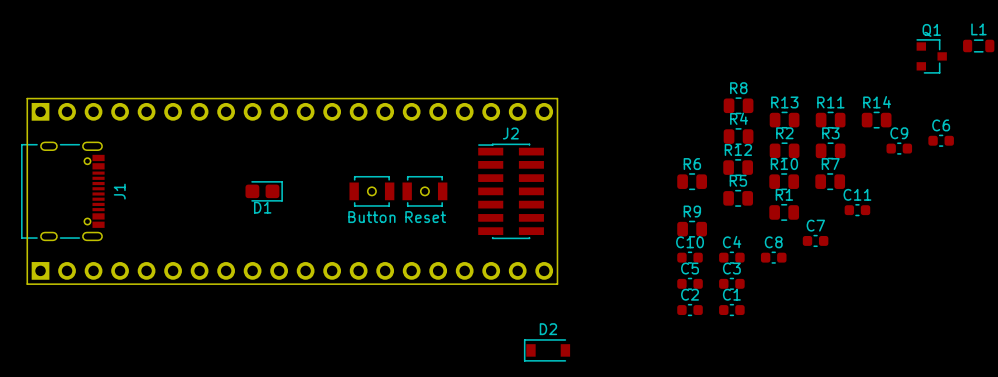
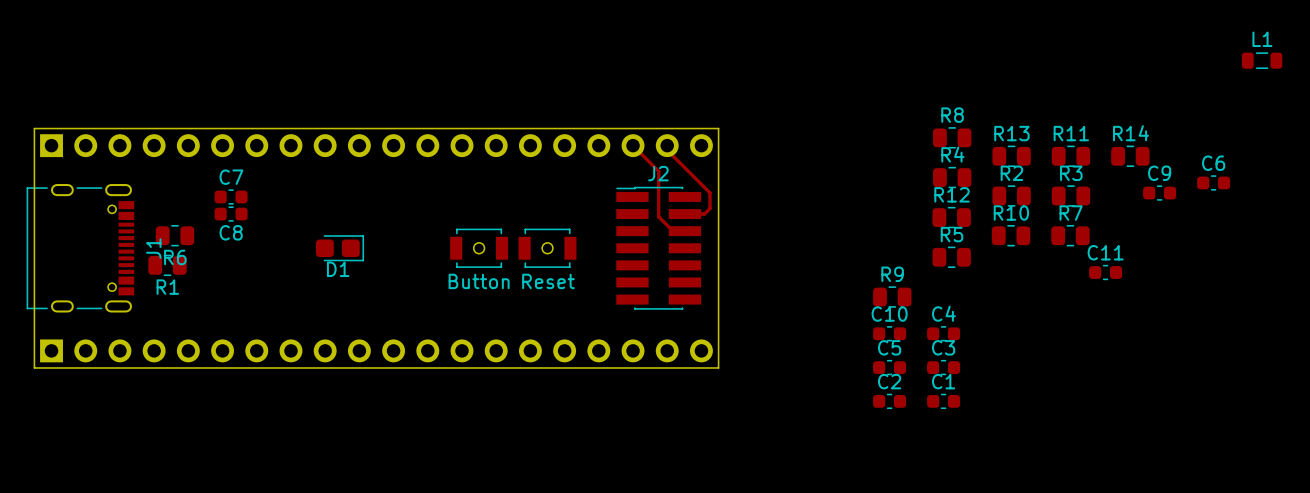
Q1: (931, 56) -> none
track: none -> (633, 145) (658, 171) (658, 216) (673, 231) (684, 231)
track: none -> (667, 145) (667, 150) (710, 192) (710, 208) (704, 214) (684, 214)
R6 name position: R6 (692, 164) -> R6 (175, 257)
R6 position: (692, 181) -> (174, 235)
R1 name position: R1 (784, 194) -> R1 (167, 287)
R1 position: (784, 212) -> (167, 265)
C7 position: (815, 240) -> (231, 196)
C8 name position: C8 (773, 242) -> C8 (231, 232)
C8 position: (773, 257) -> (231, 214)
D2: (547, 350) -> none

